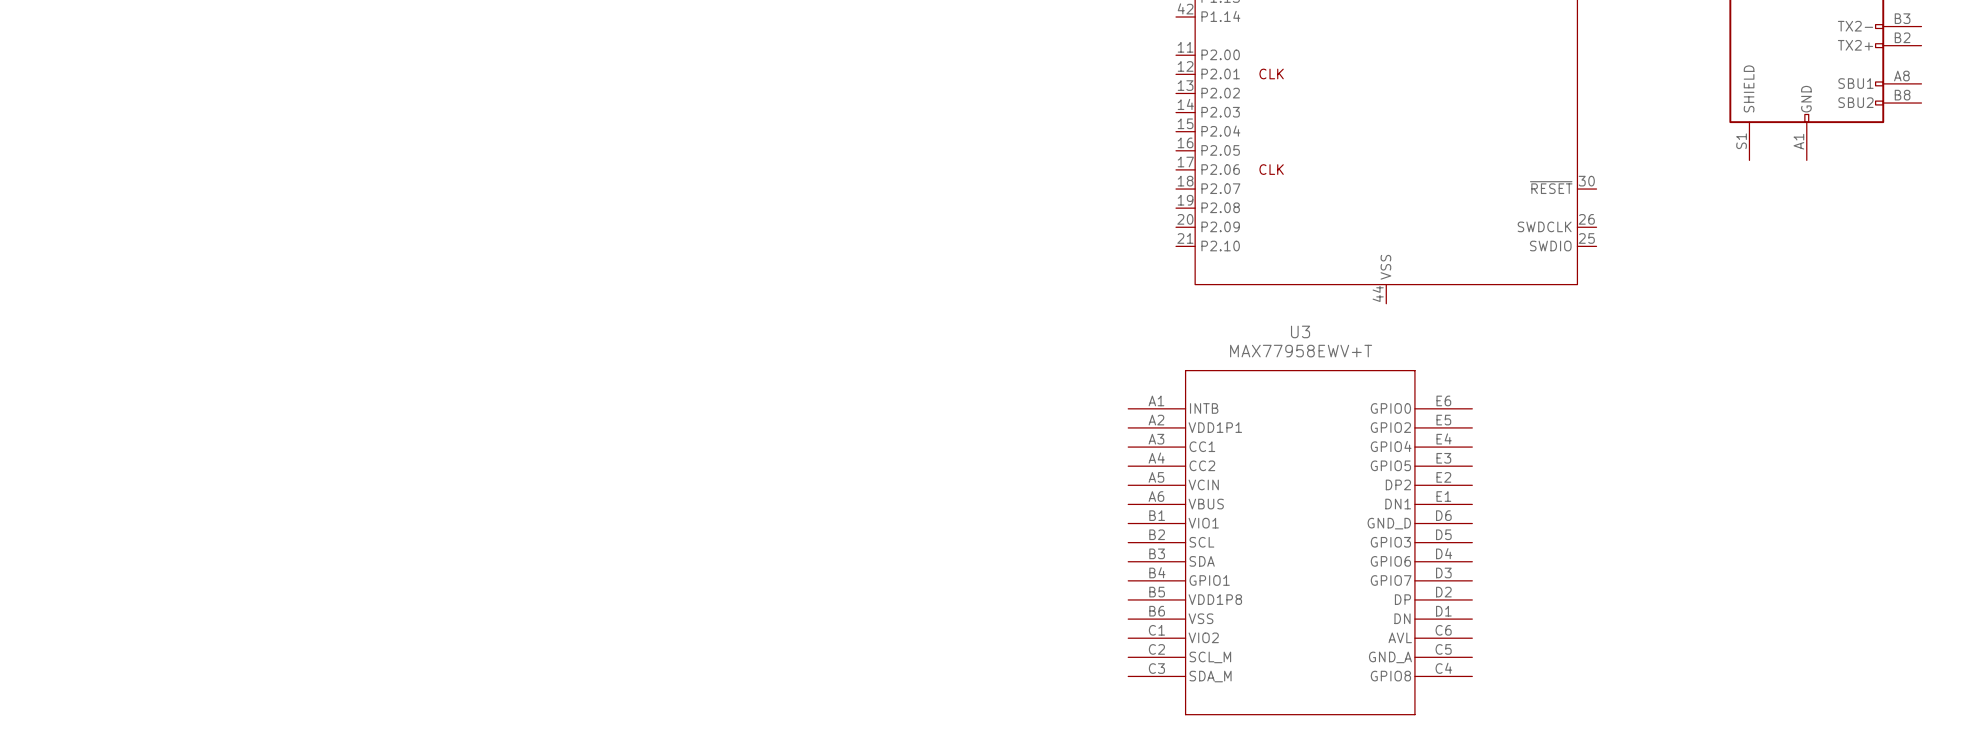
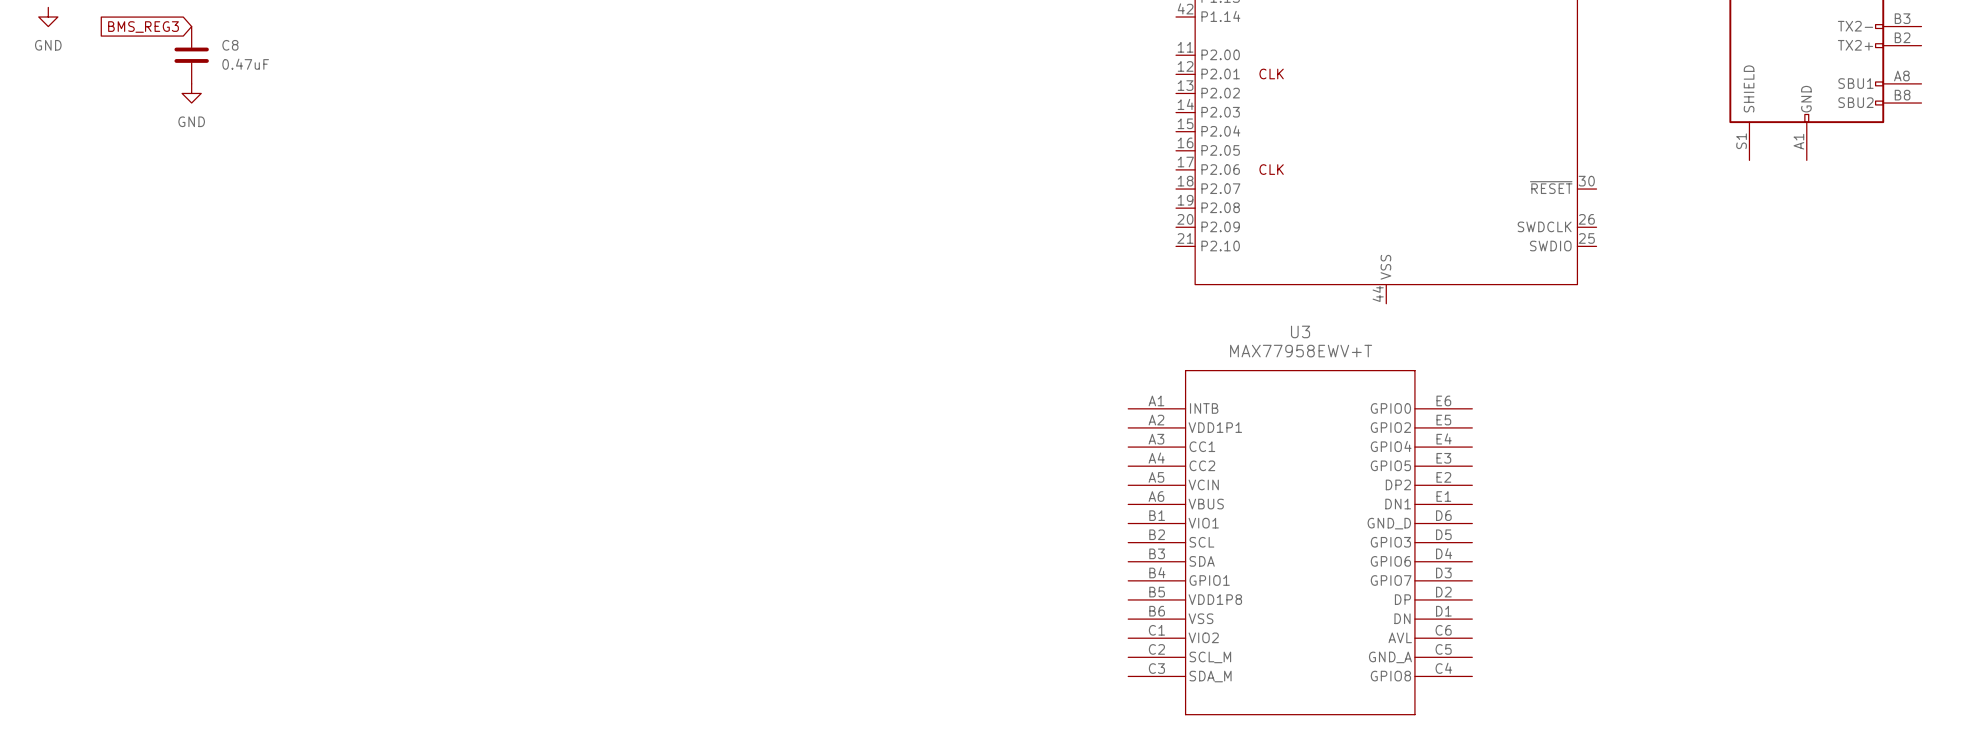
power symbol: none -> GND (48, 17)
global label: none -> BMS_REG3 (143, 27)
C8: none -> 0.47uF (191, 55)
power symbol: none -> GND (191, 93)

